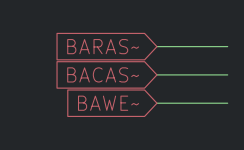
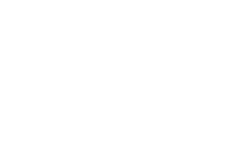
global label: BARAS~ (103, 46) -> none
wire: (156, 46) (227, 46) -> none
global label: BACAS~ (103, 74) -> none
wire: (156, 74) (227, 74) -> none
global label: BAWE~ (108, 103) -> none
wire: (156, 103) (227, 103) -> none

